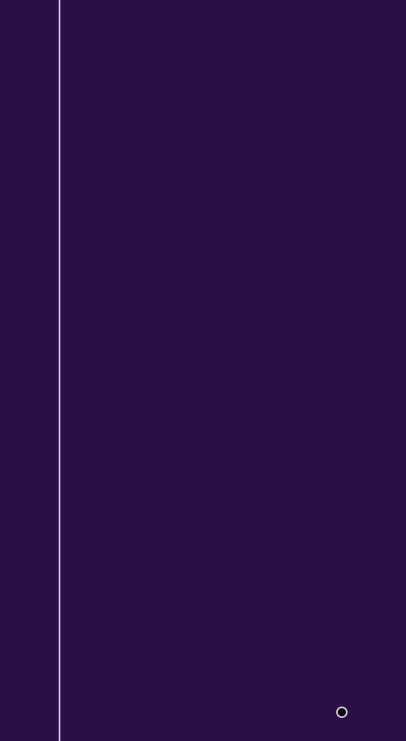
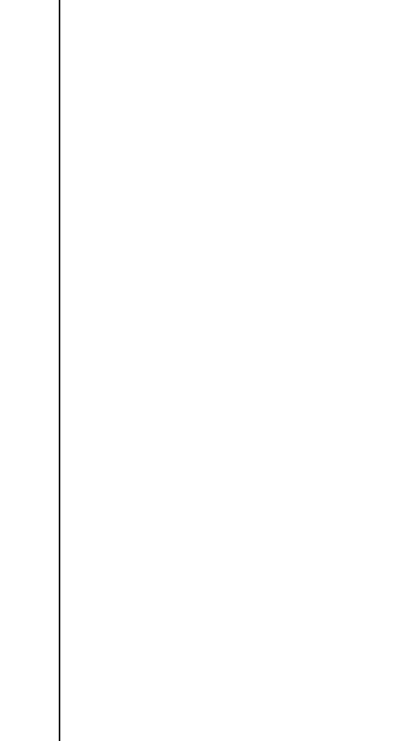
hole: (341, 712) -> none

